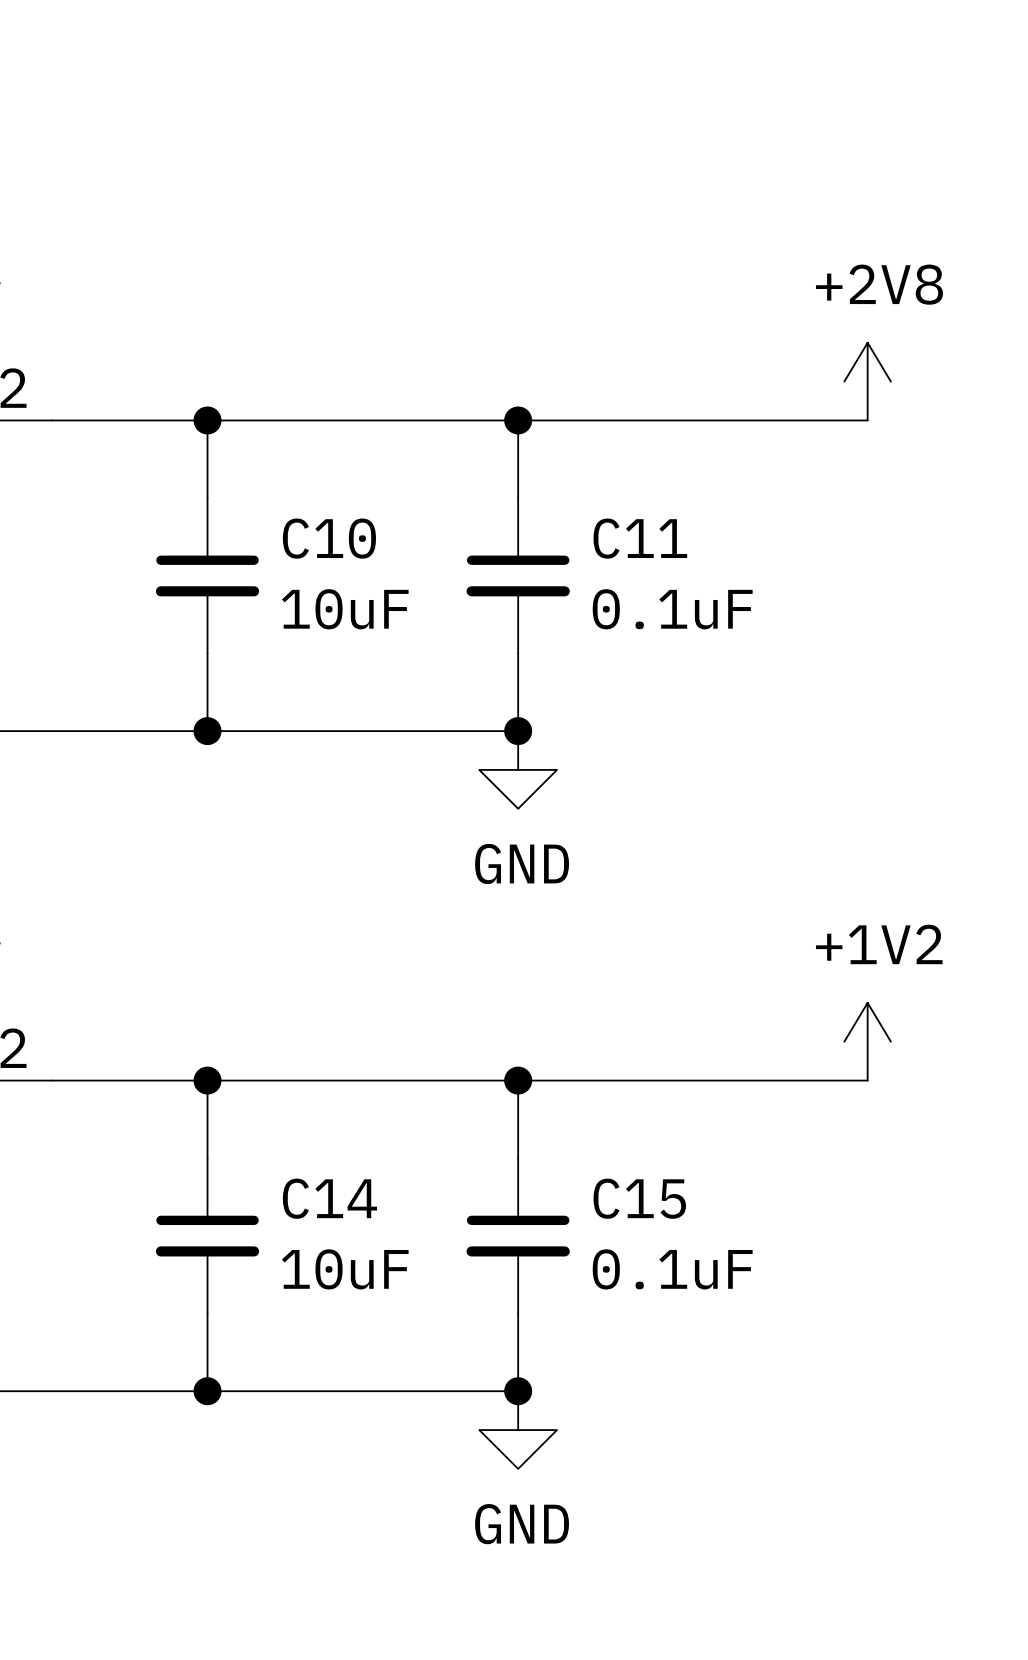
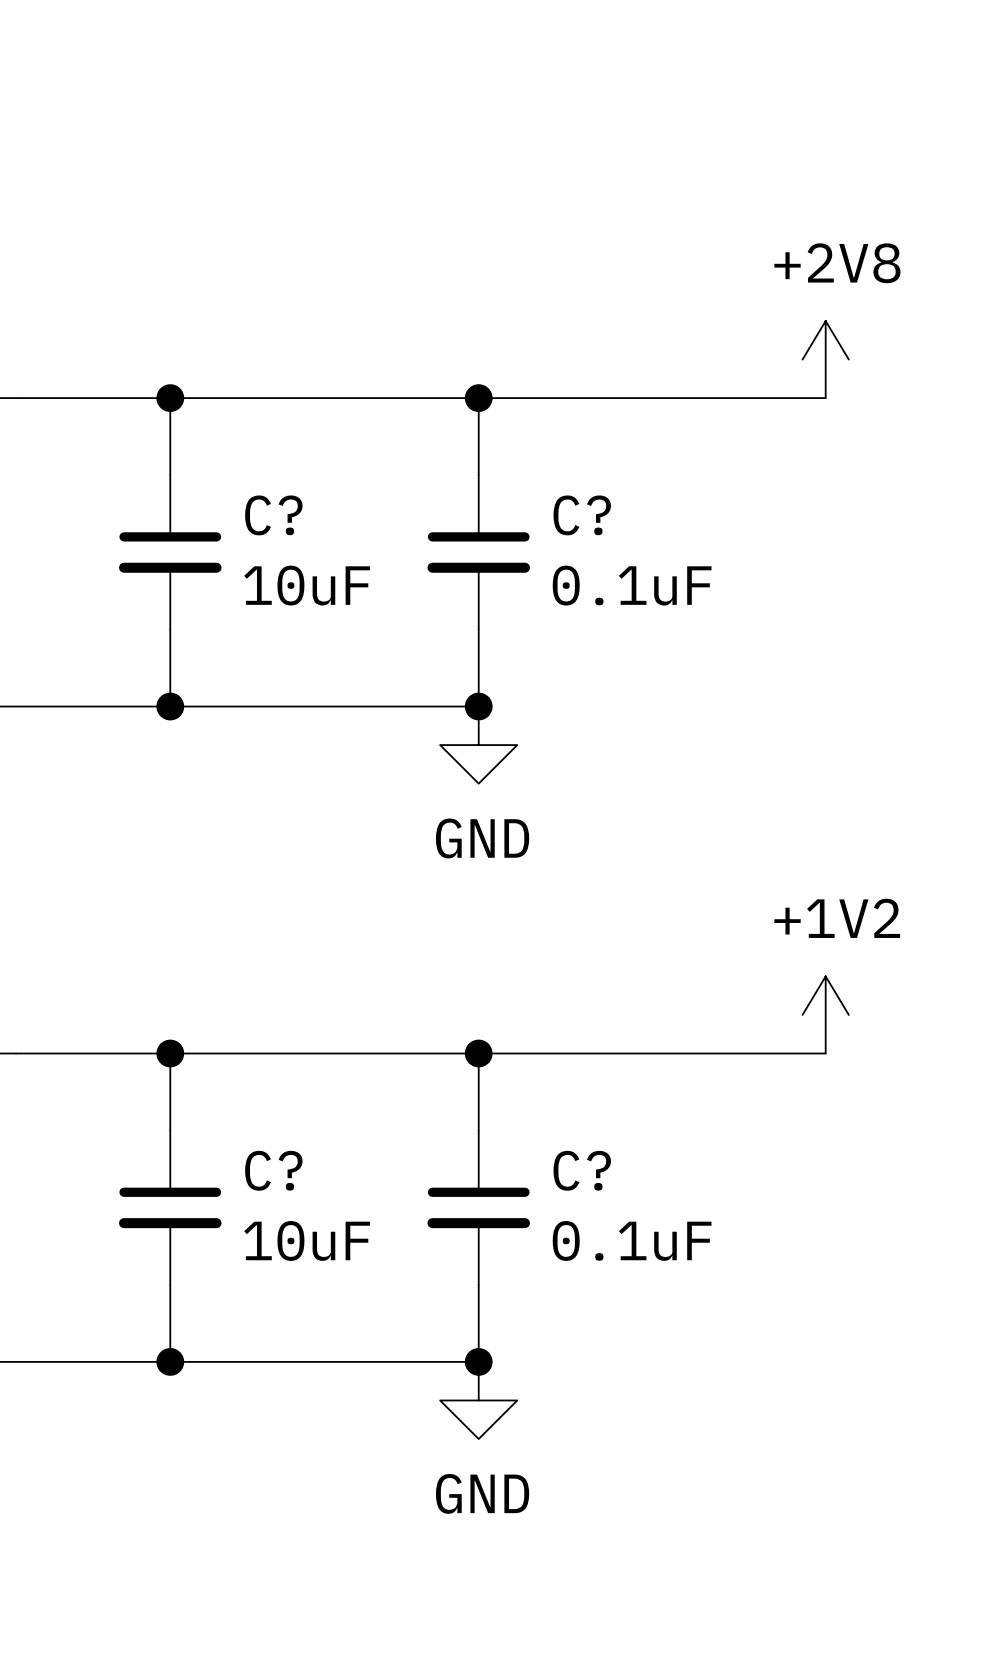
C10 name: C10 (329, 538) -> C? (273, 515)
C11 name: C11 (640, 538) -> C? (582, 515)
C14 name: C14 (329, 1198) -> C? (273, 1170)
C15 name: C15 (639, 1198) -> C? (582, 1170)

